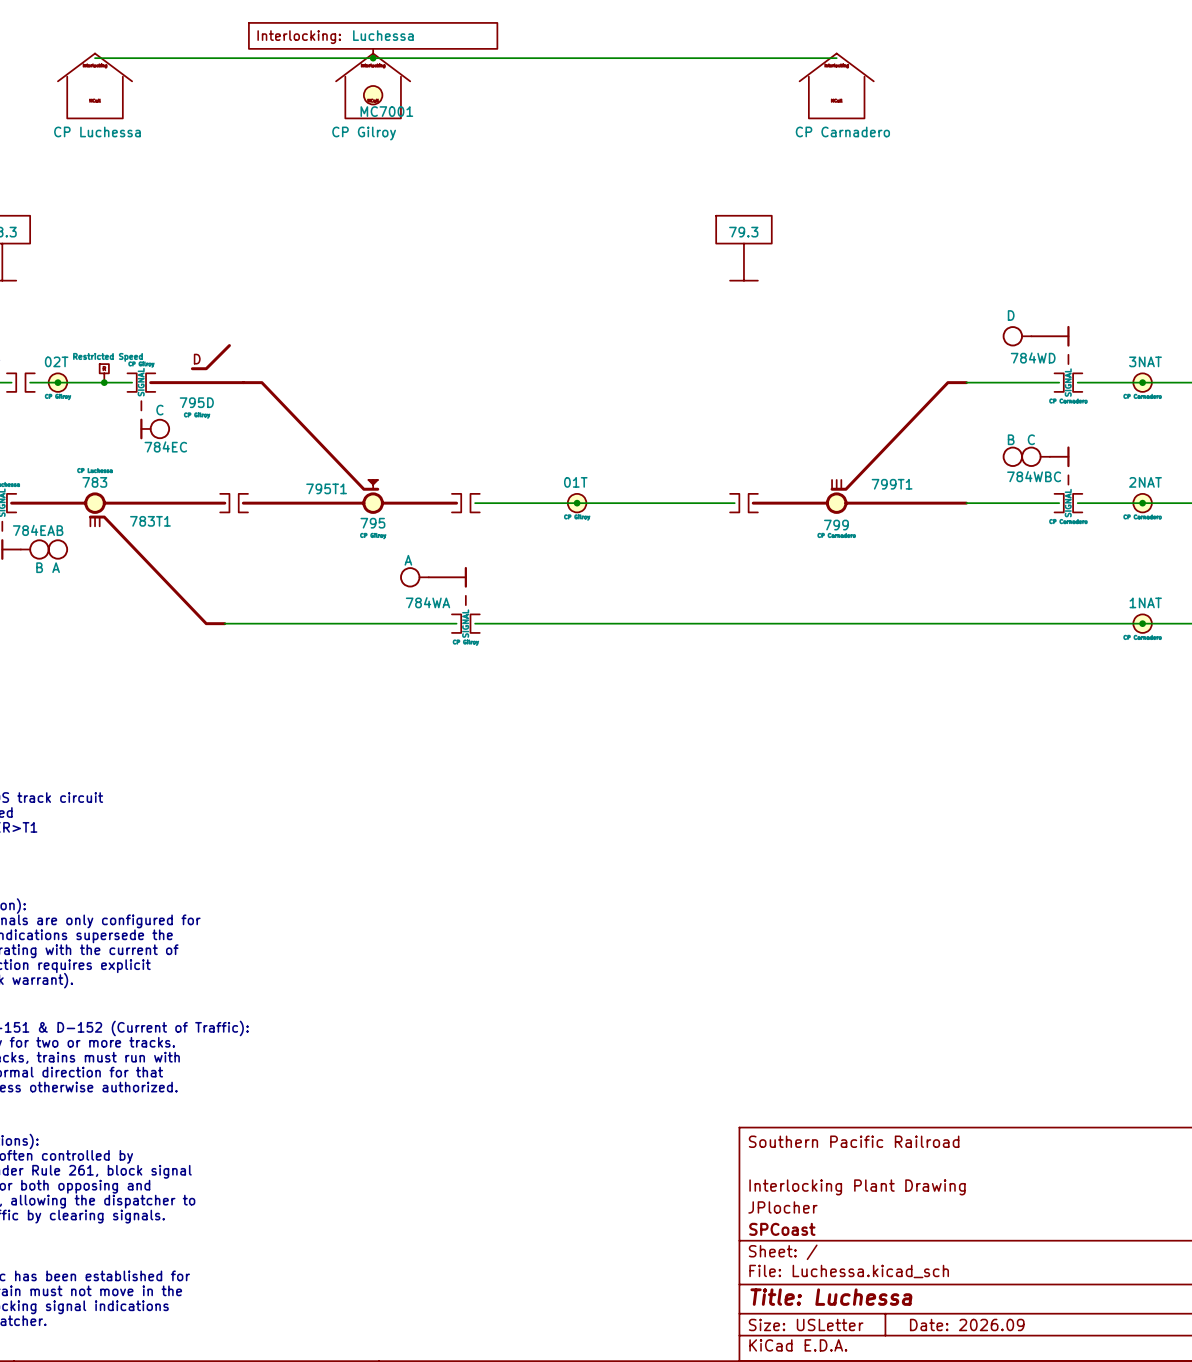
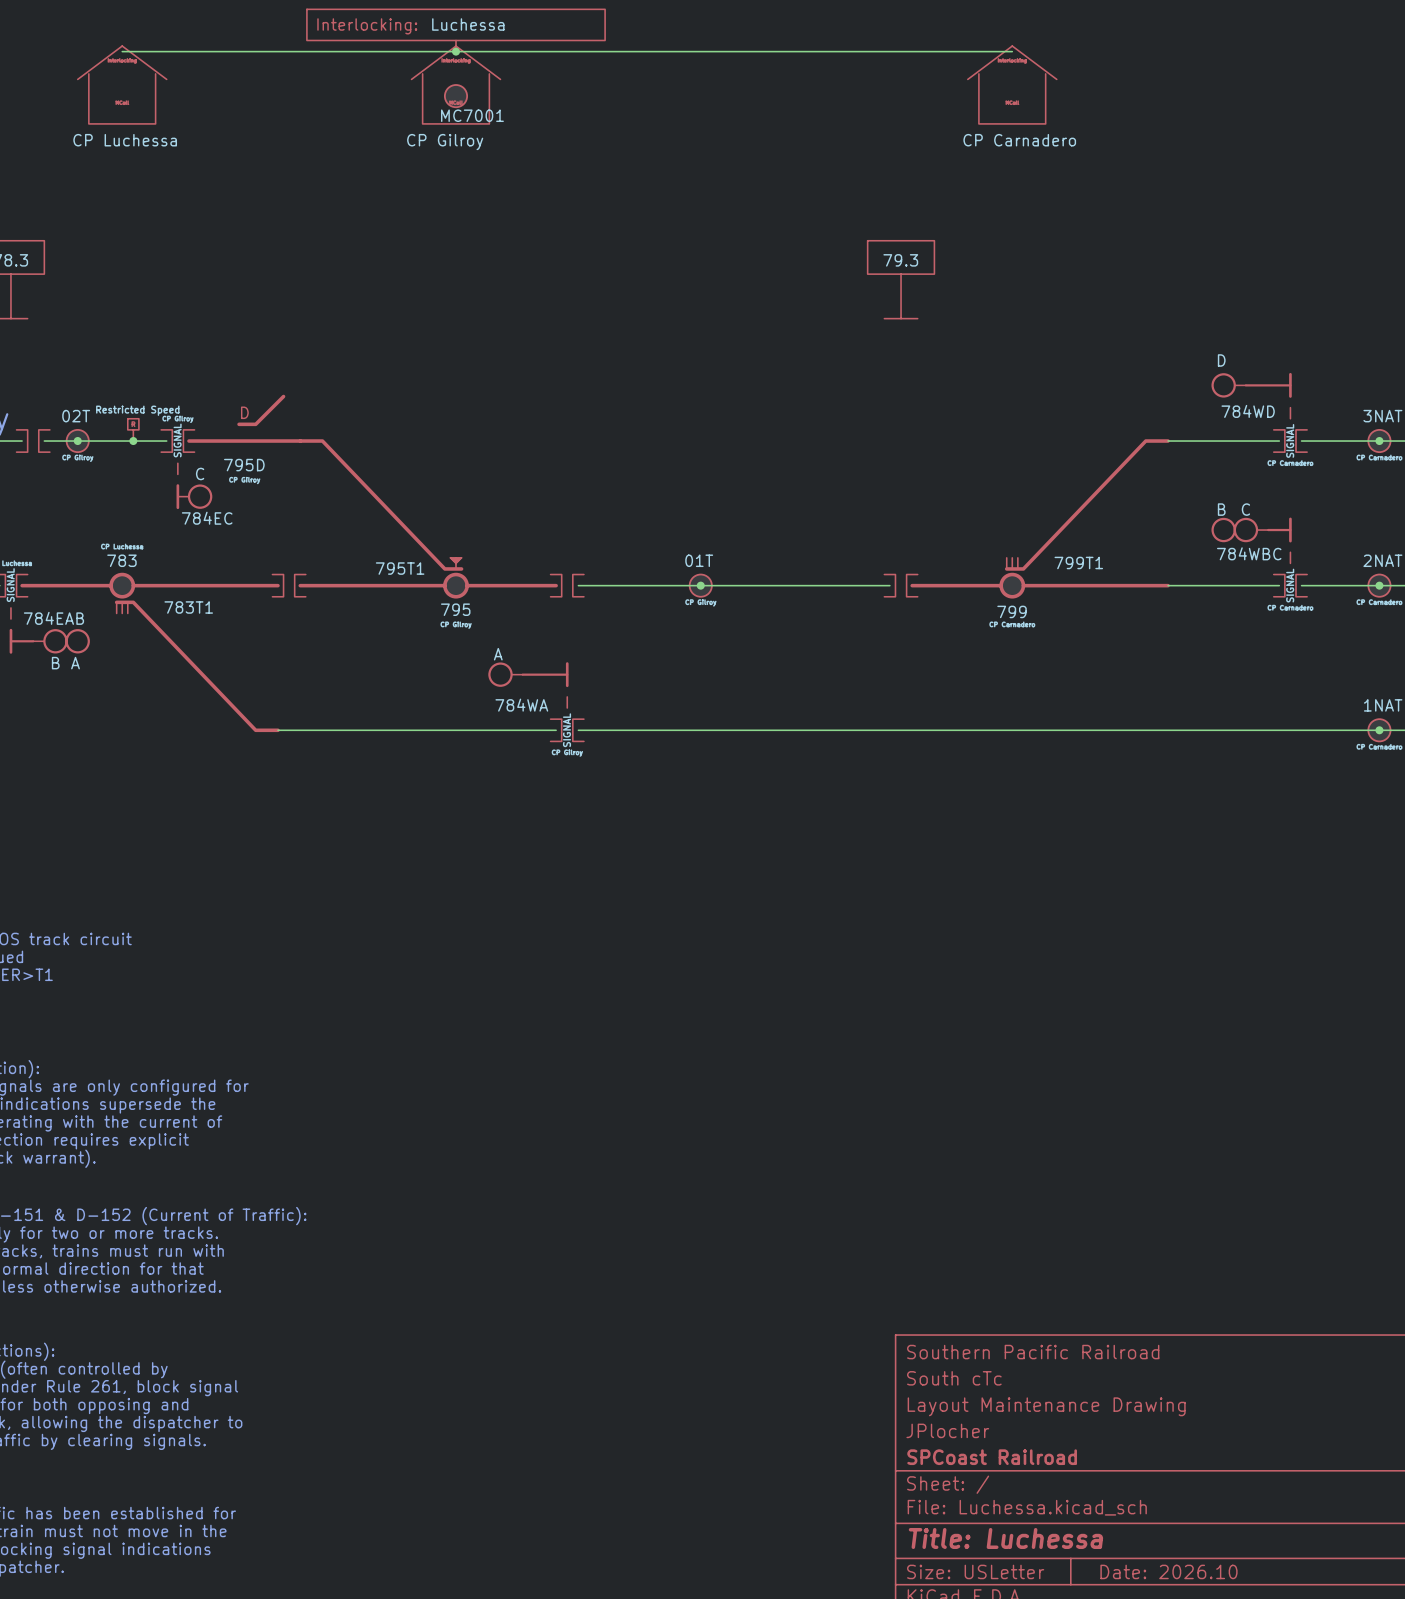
title block: none -> South cTc (954, 1378)
title block: Interlocking Plant Drawing (857, 1187) -> Layout Maintenance Drawing (1046, 1406)
title block: SPCoast (782, 1229) -> SPCoast Railroad (992, 1457)
title block: Date: 2026.09 (967, 1324) -> Date: 2026.10 (1168, 1571)

